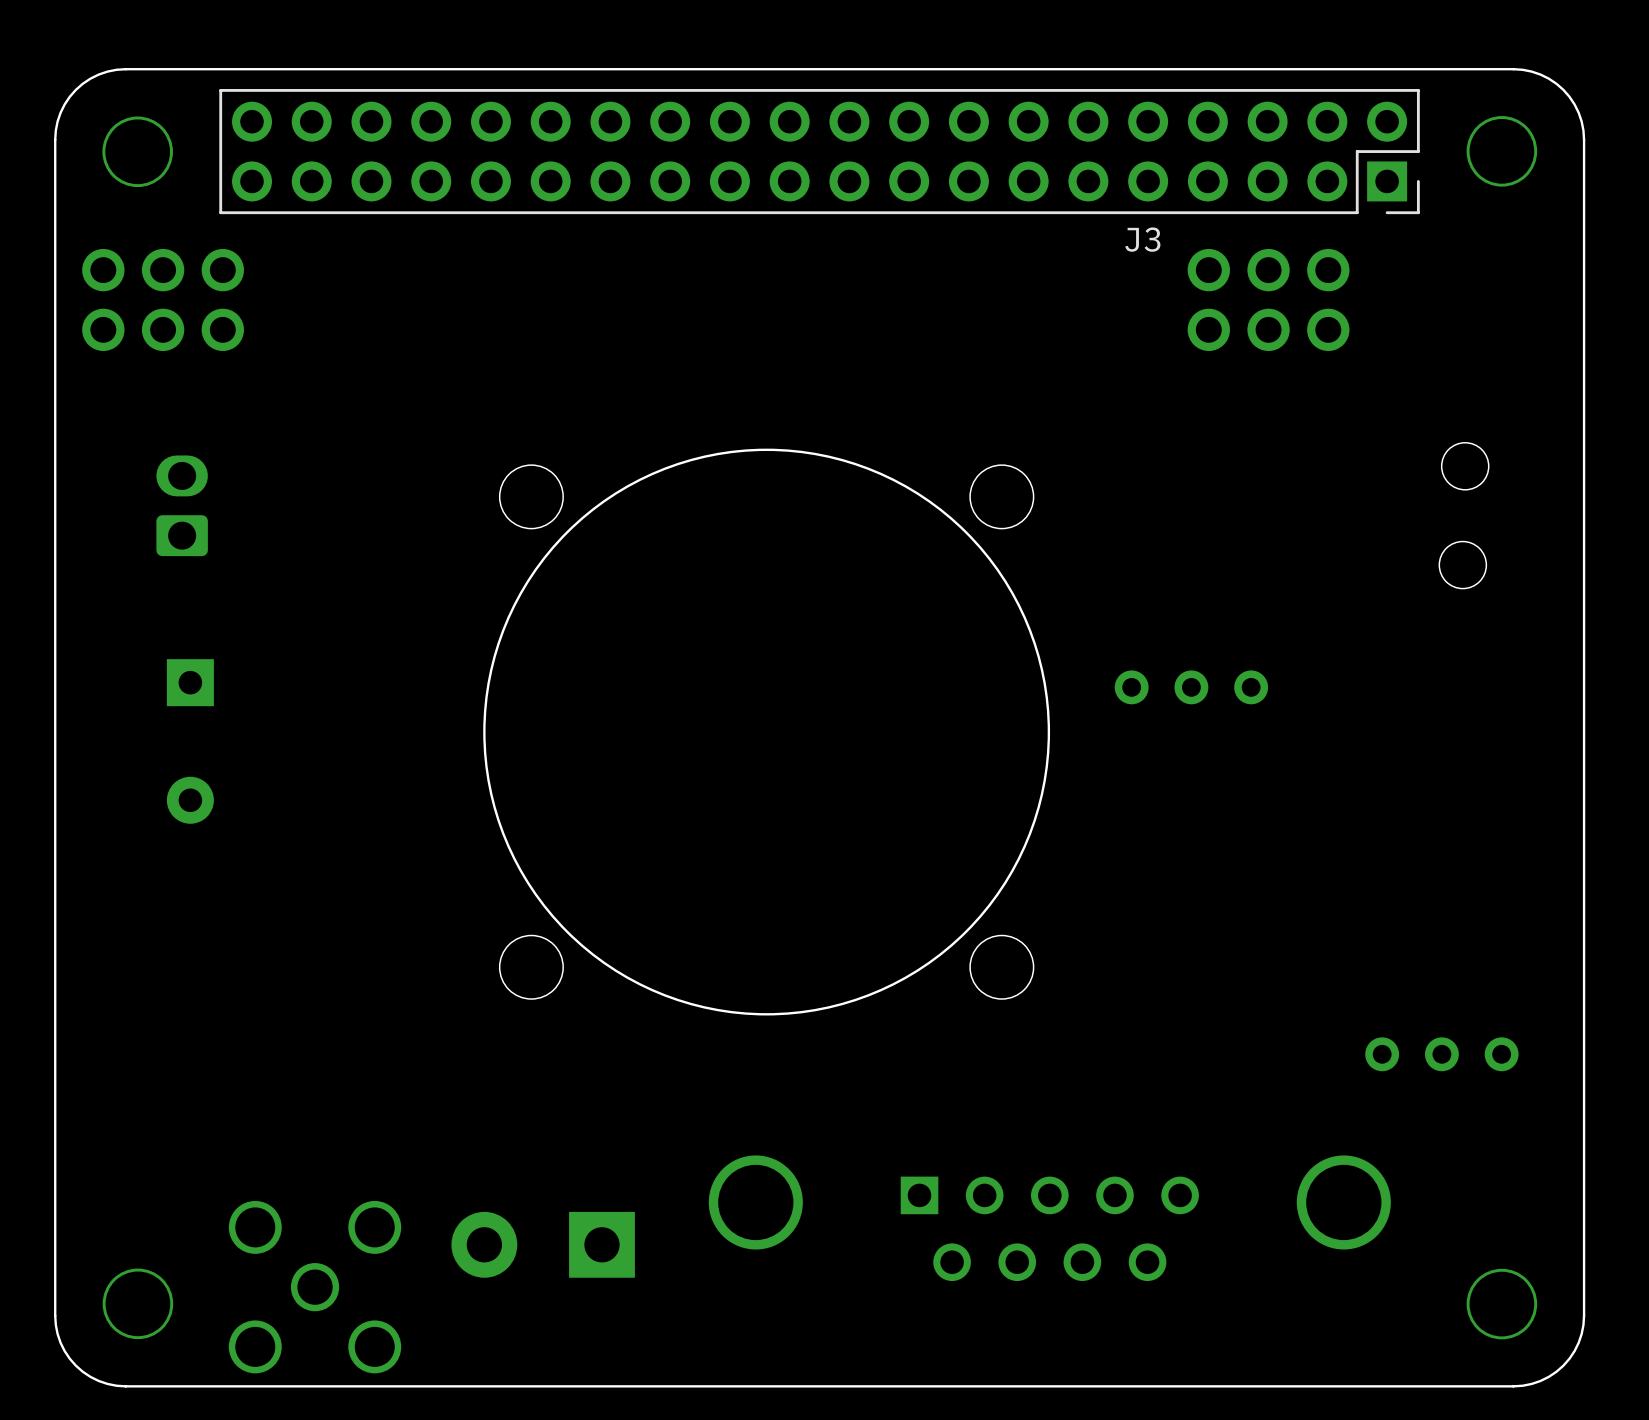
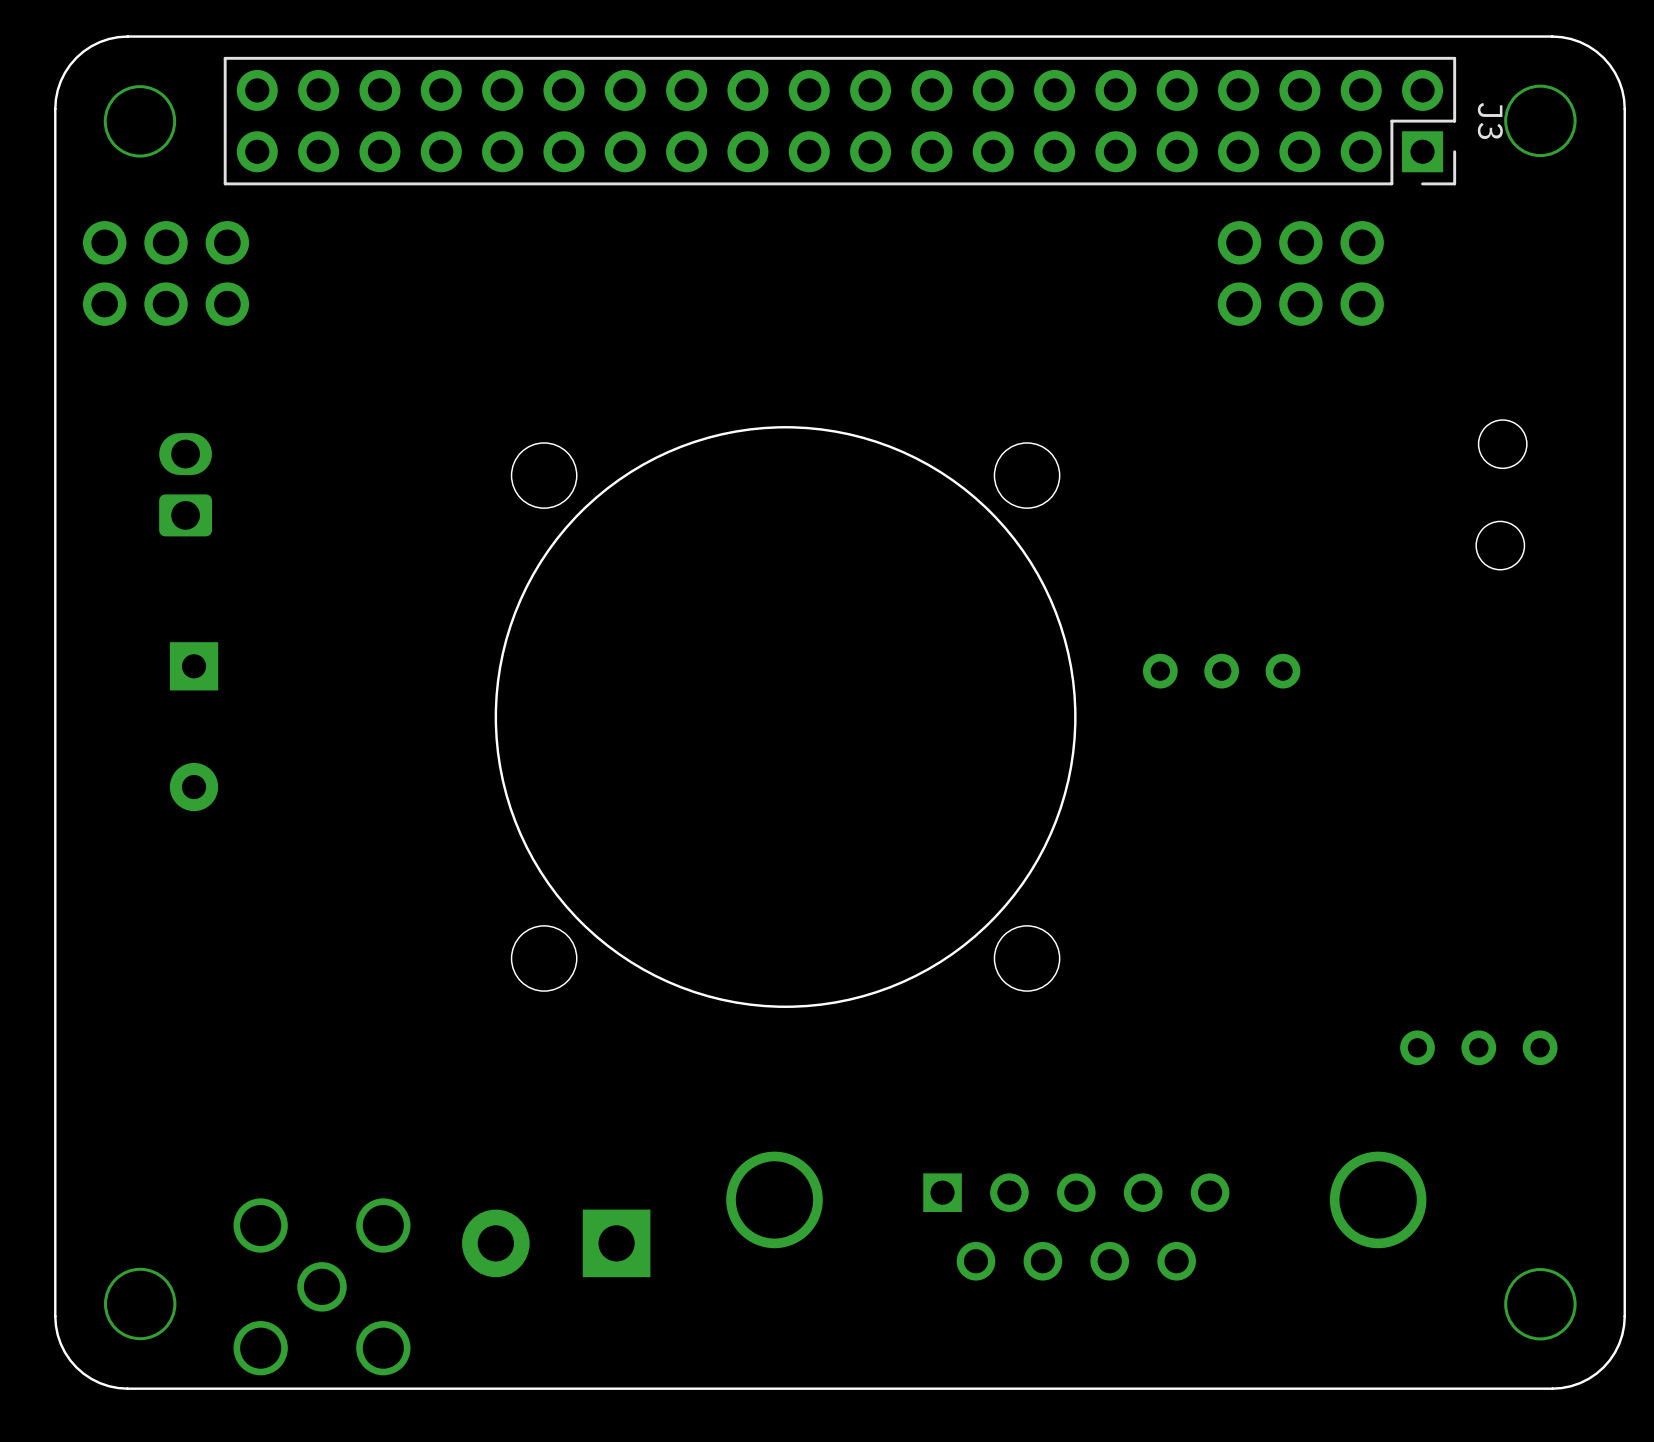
J3 name rotation: 0° (1142, 239) -> 90° clockwise (1490, 120)
J3 name position: J3 (1142, 239) -> J3 (1490, 120)

